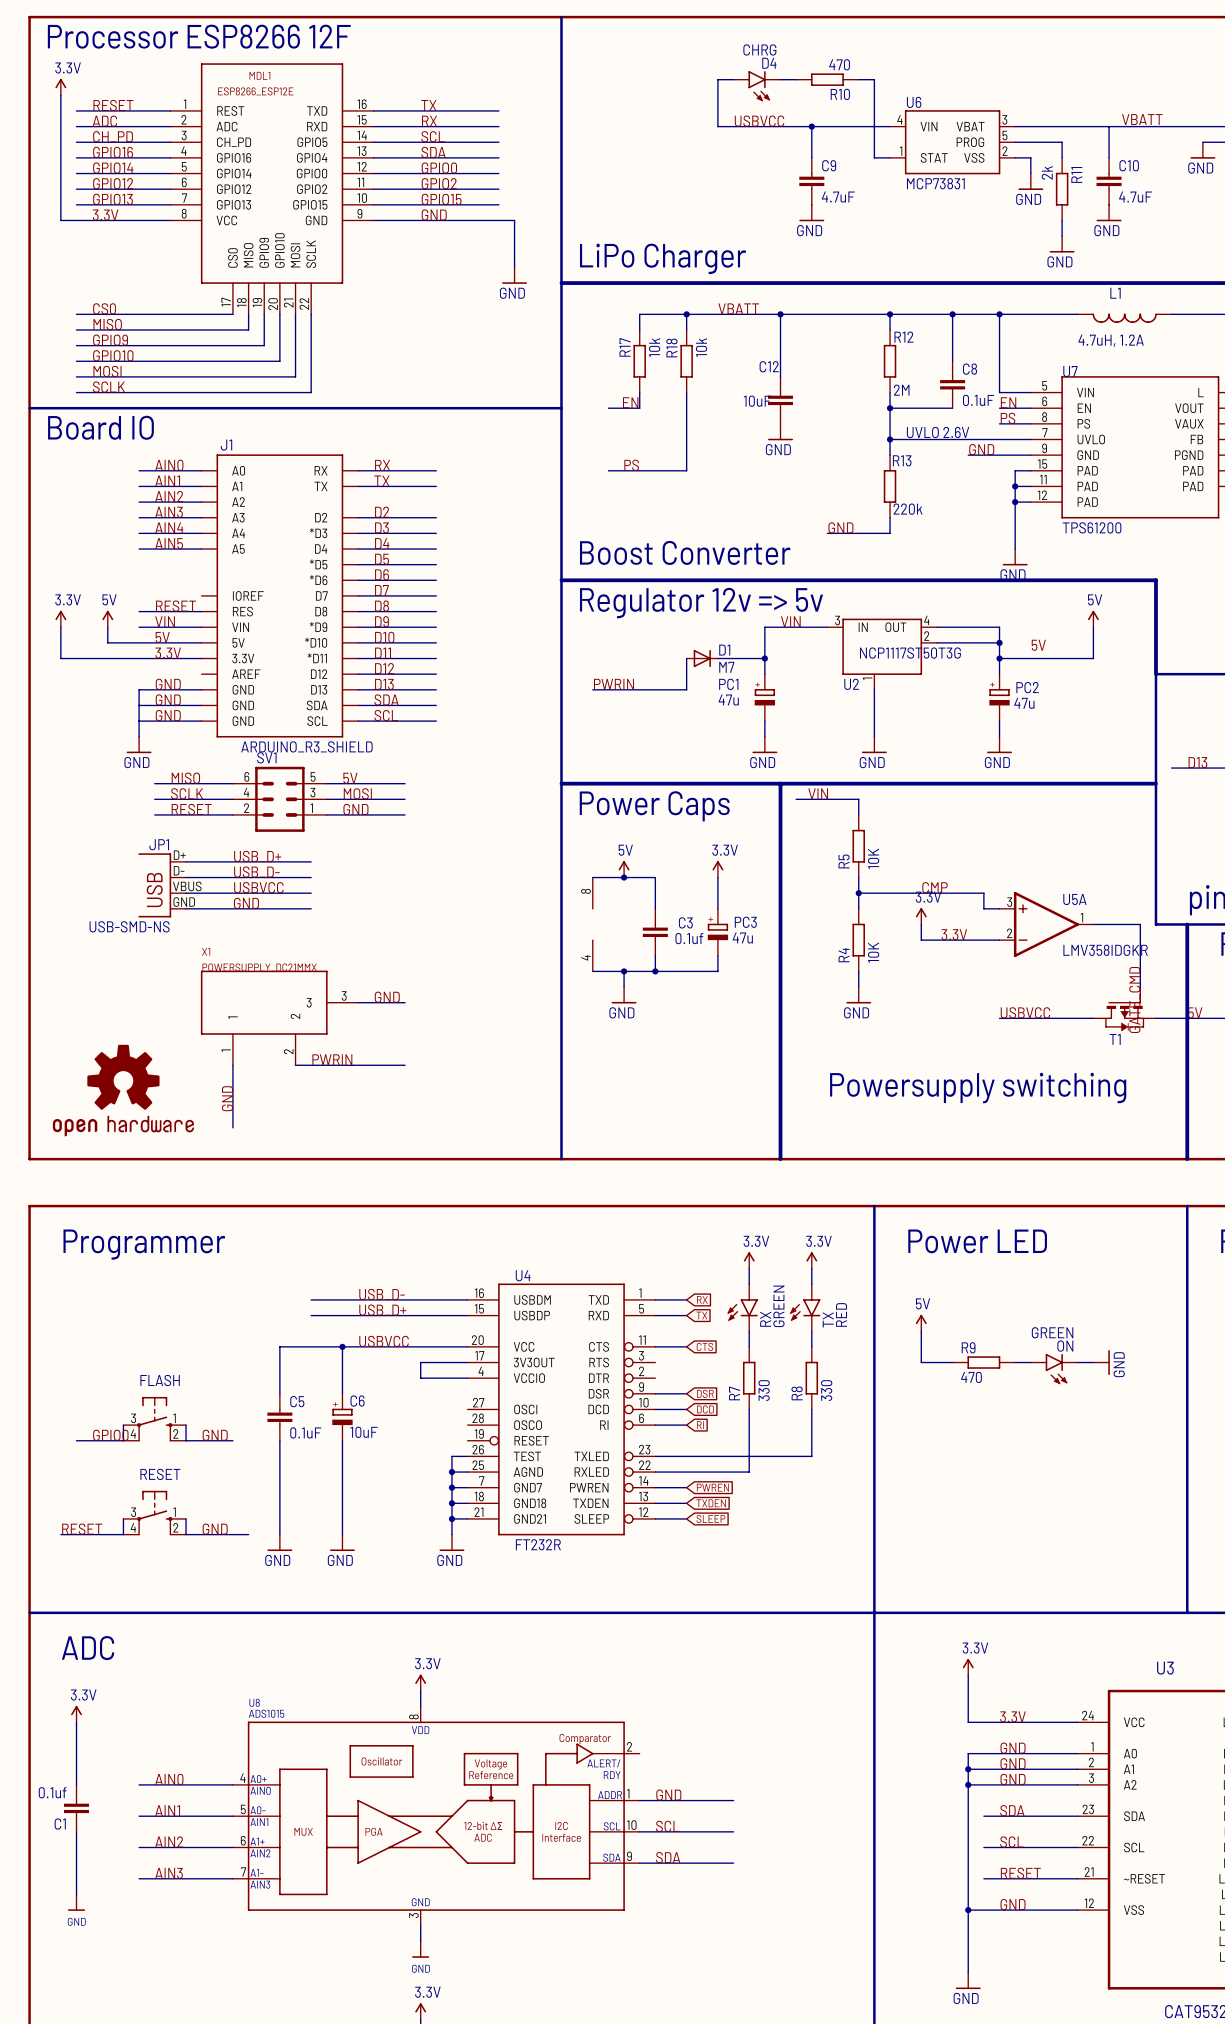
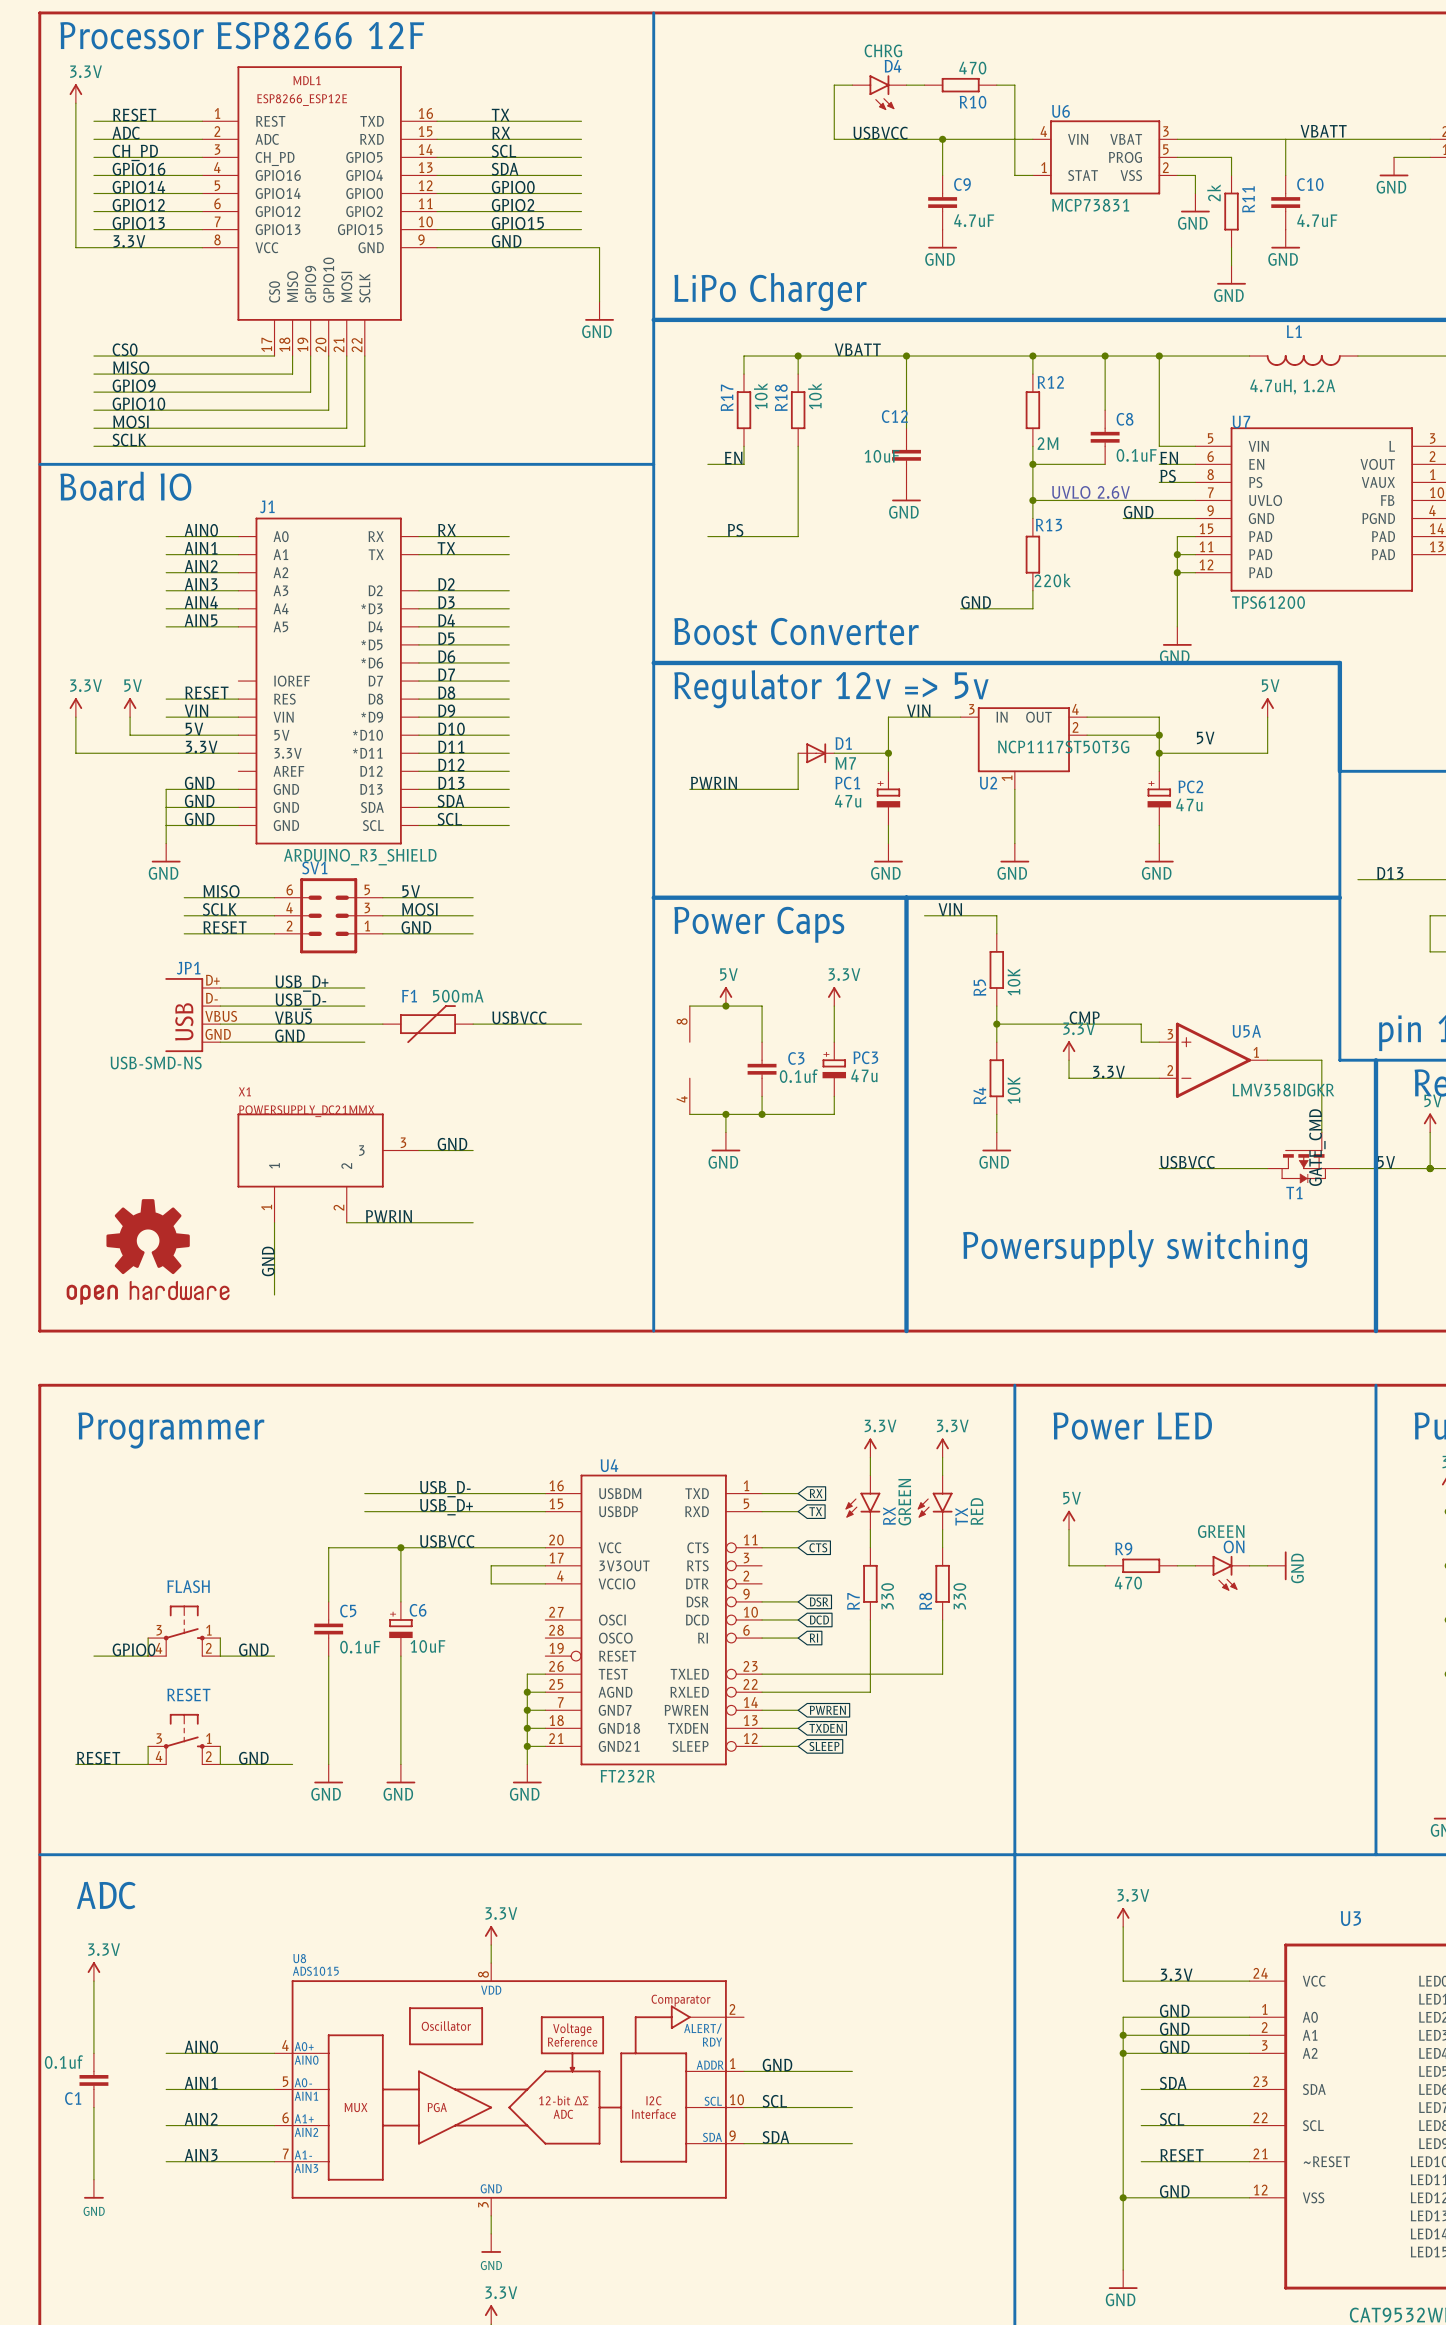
label: USBVCC (258, 887) -> VBUS (293, 1017)
label: none -> USBVCC (519, 1017)
wire: none -> (364, 1024) (382, 1024)
F1: none -> 500mA (428, 1024)
wire: none -> (473, 1024) (581, 1024)

